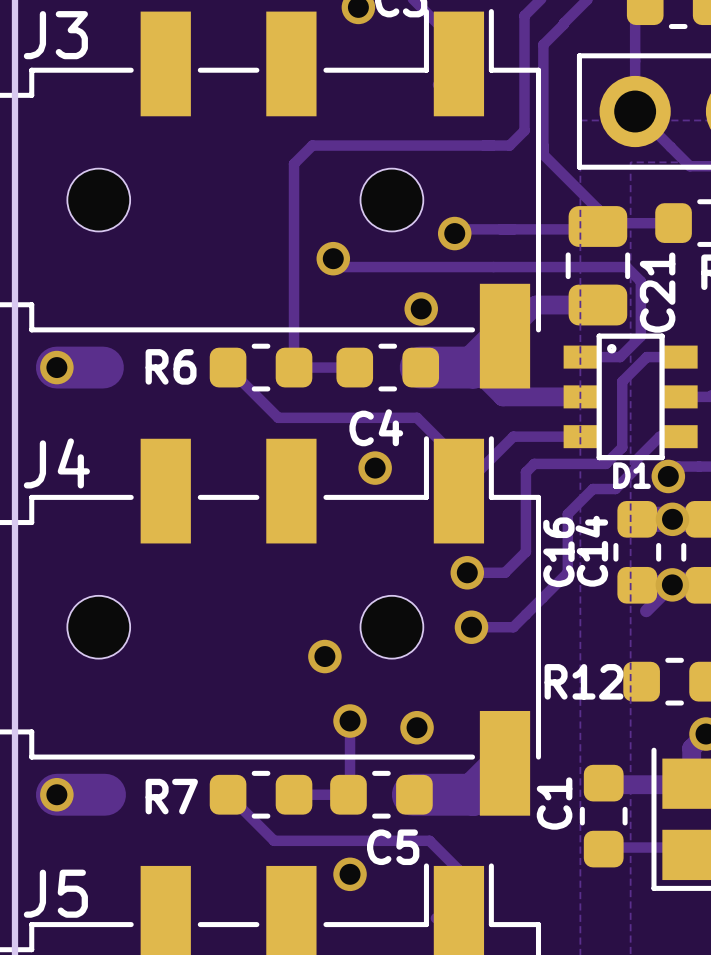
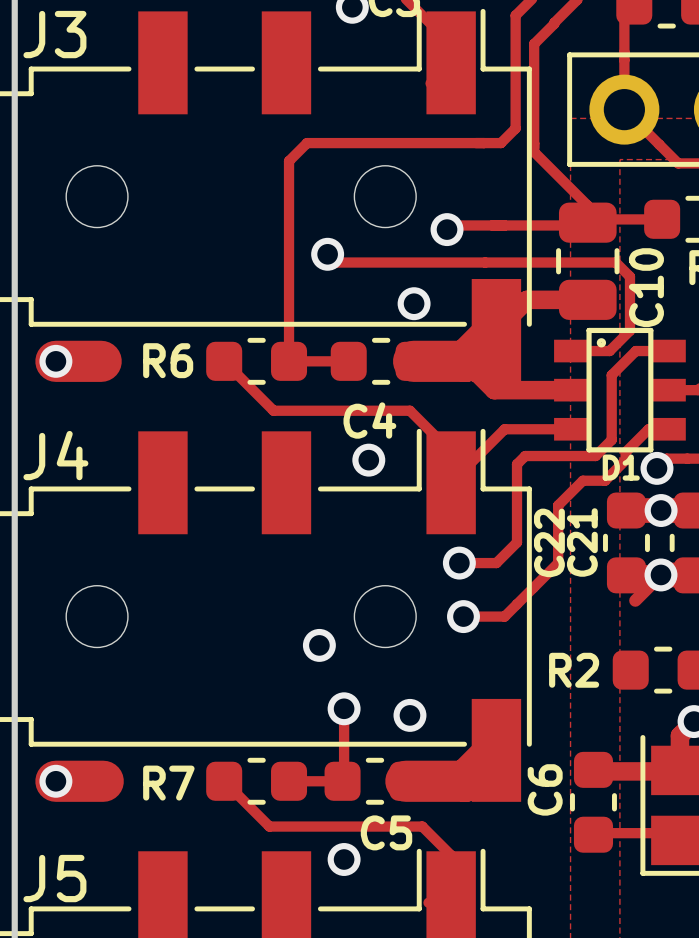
C21 name: C21 (657, 292) -> C10 (646, 287)
C14 name: C14 (591, 551) -> C21 (582, 542)
C16 name: C16 (558, 552) -> C22 (549, 542)
R12 name: R12 (584, 681) -> R2 (574, 670)
C1 name: C1 (554, 803) -> C6 (545, 789)

